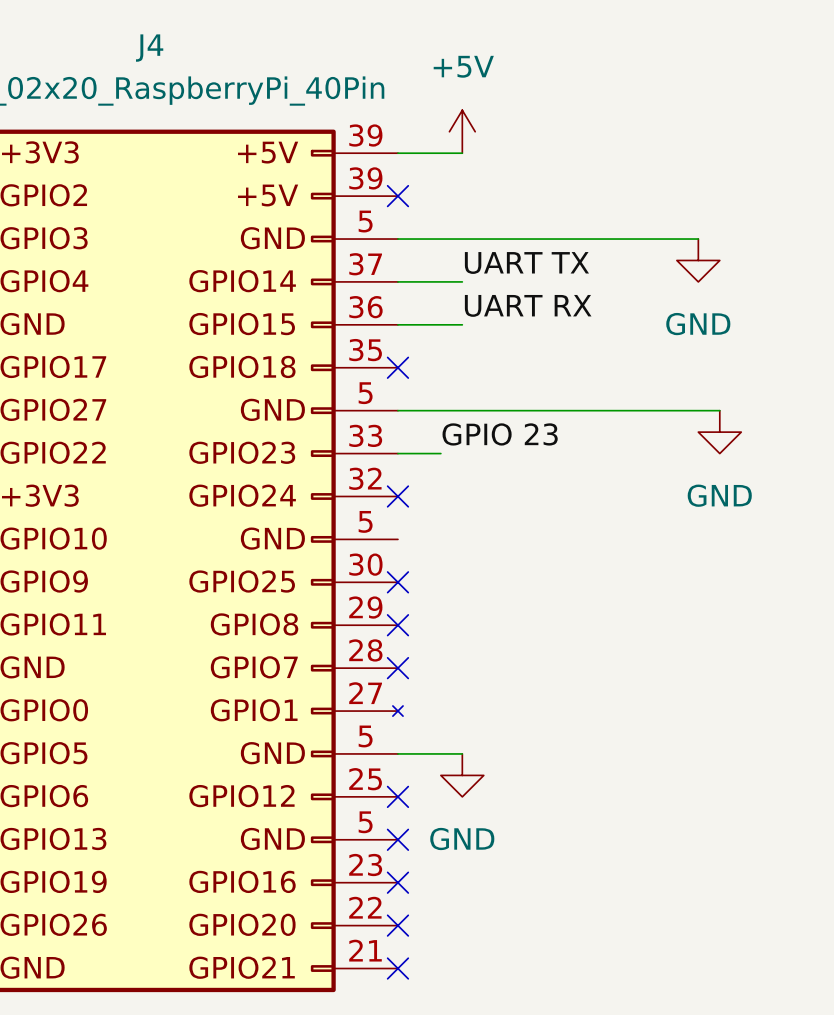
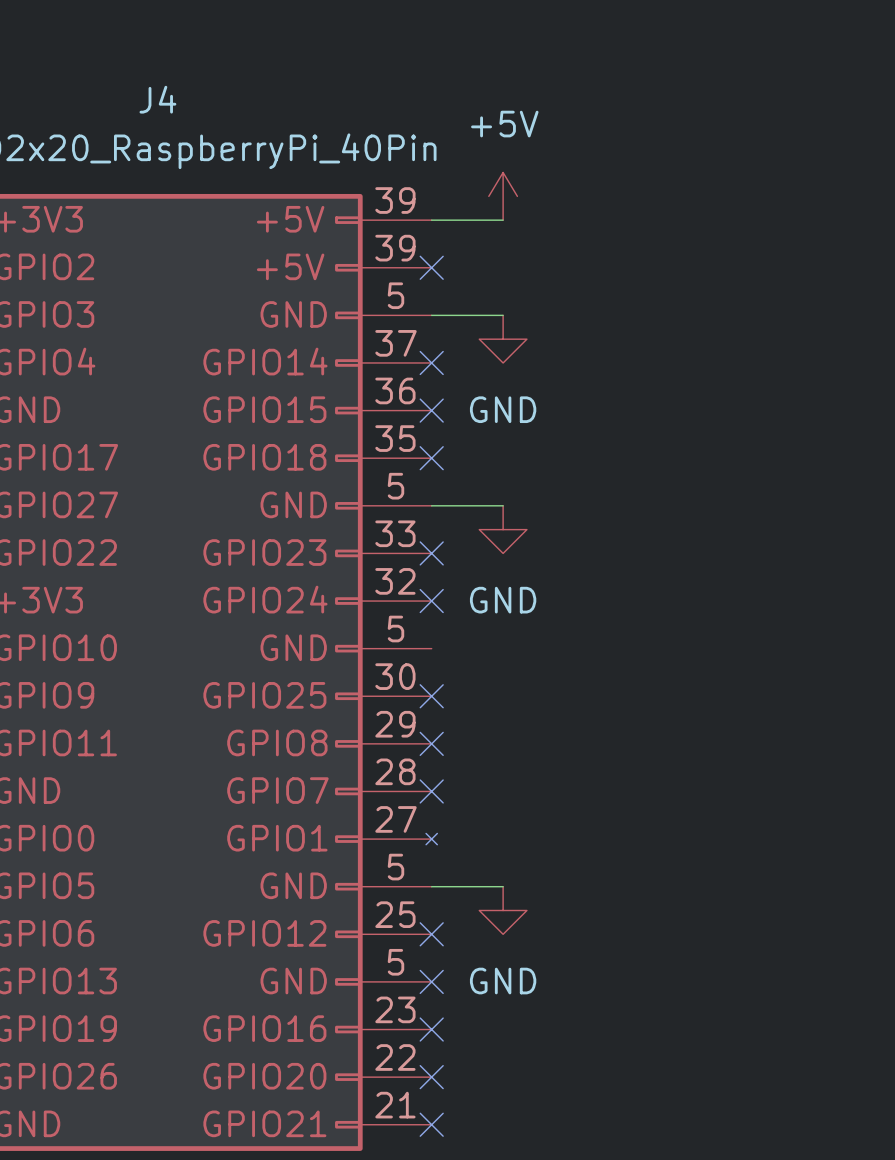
wire: (462, 239) (698, 239) -> none
power symbol: none -> GND (503, 339)
power symbol: GND (698, 260) -> none
label: UART TX (526, 262) -> none
wire: (397, 281) (462, 281) -> none
no-connect mark: none -> (431, 362)
label: UART RX (528, 305) -> none
wire: (397, 324) (462, 324) -> none
no-connect mark: none -> (431, 410)
wire: (462, 410) (719, 410) -> none
power symbol: none -> GND (503, 529)
power symbol: GND (719, 432) -> none
label: GPIO 23 (500, 434) -> none
wire: (397, 453) (440, 453) -> none
no-connect mark: none -> (431, 553)

